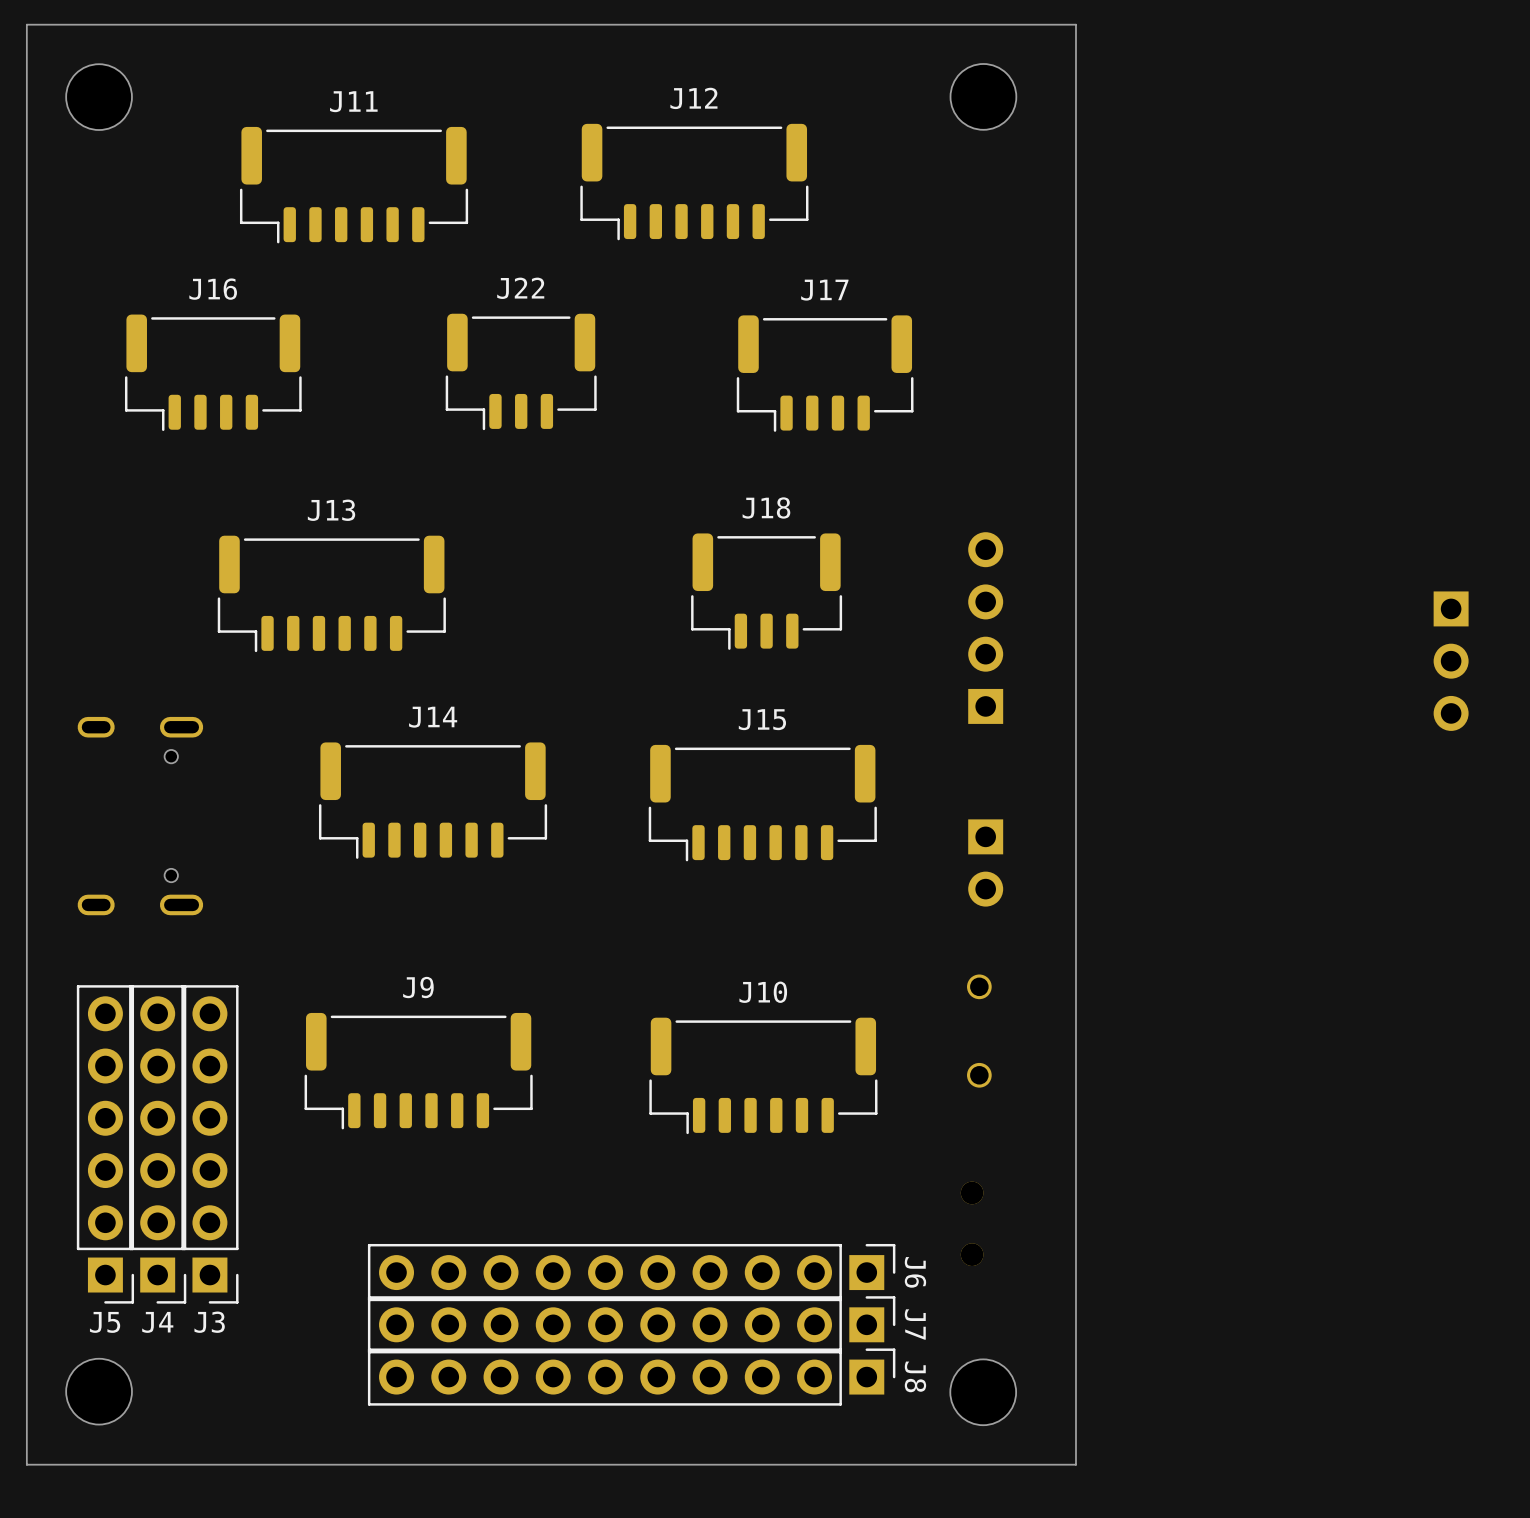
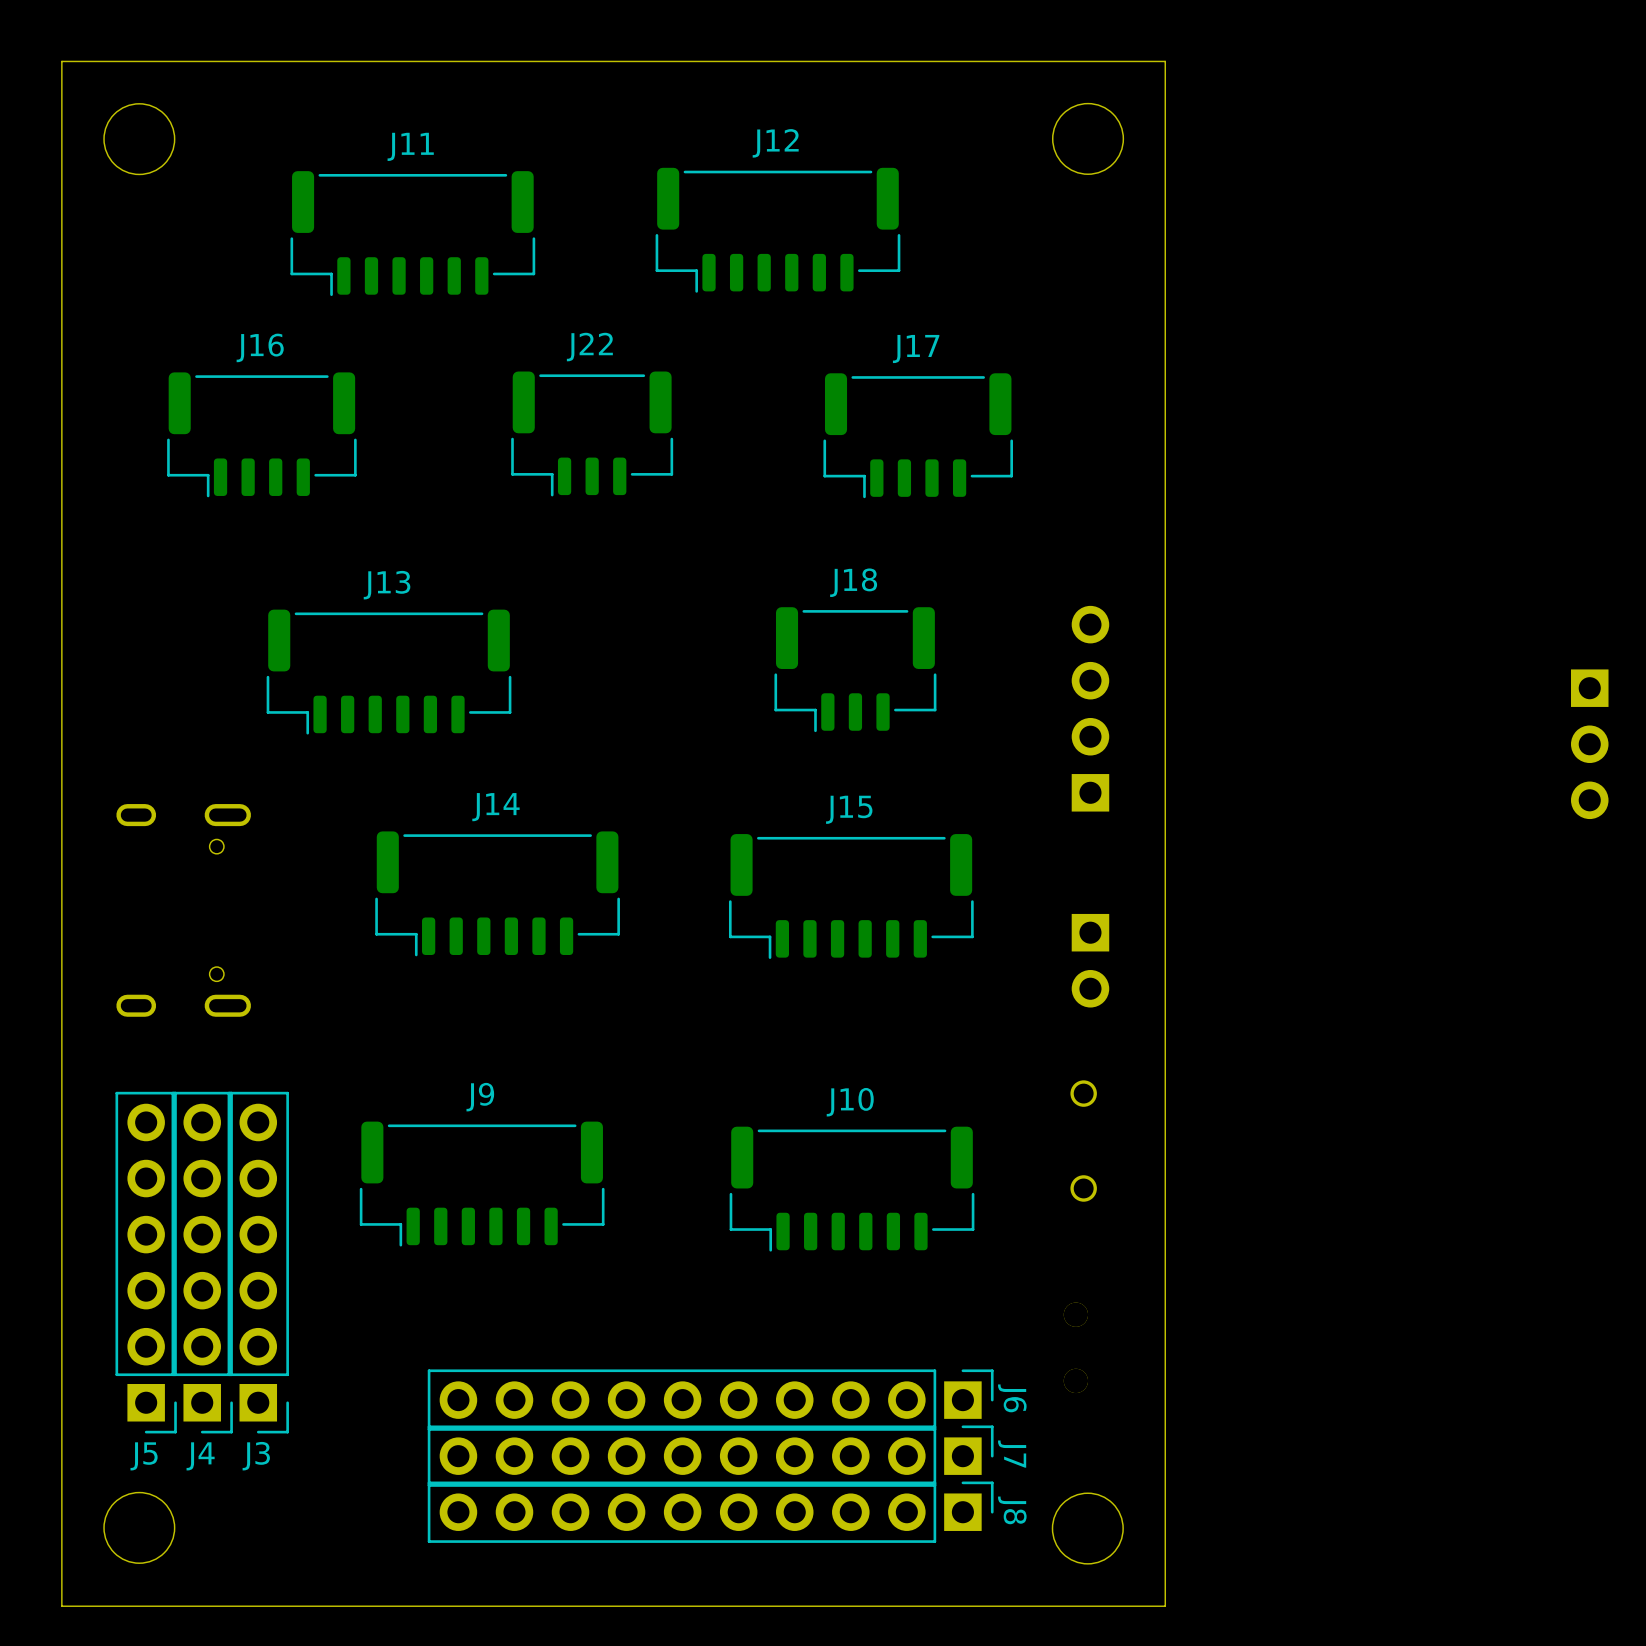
board edge: (1055, 24) (1075, 24) (1075, 1464) (1055, 1464) -> (1165, 61) (1165, 1606)

